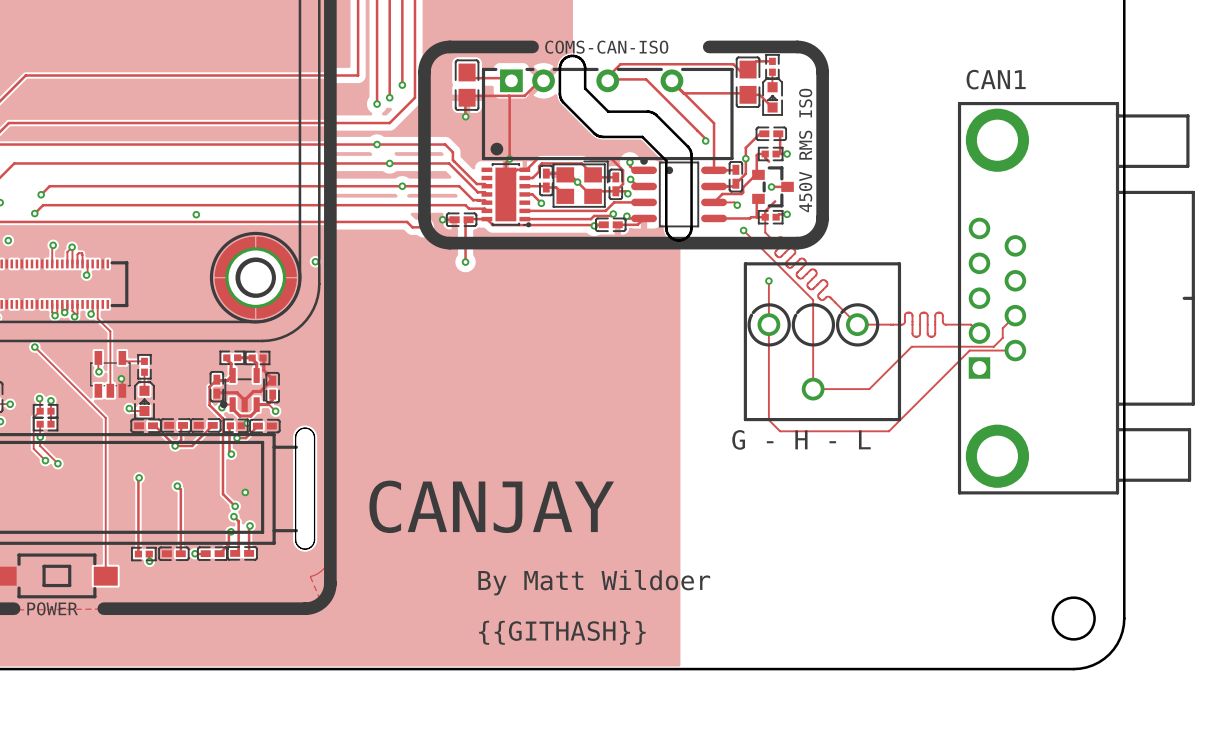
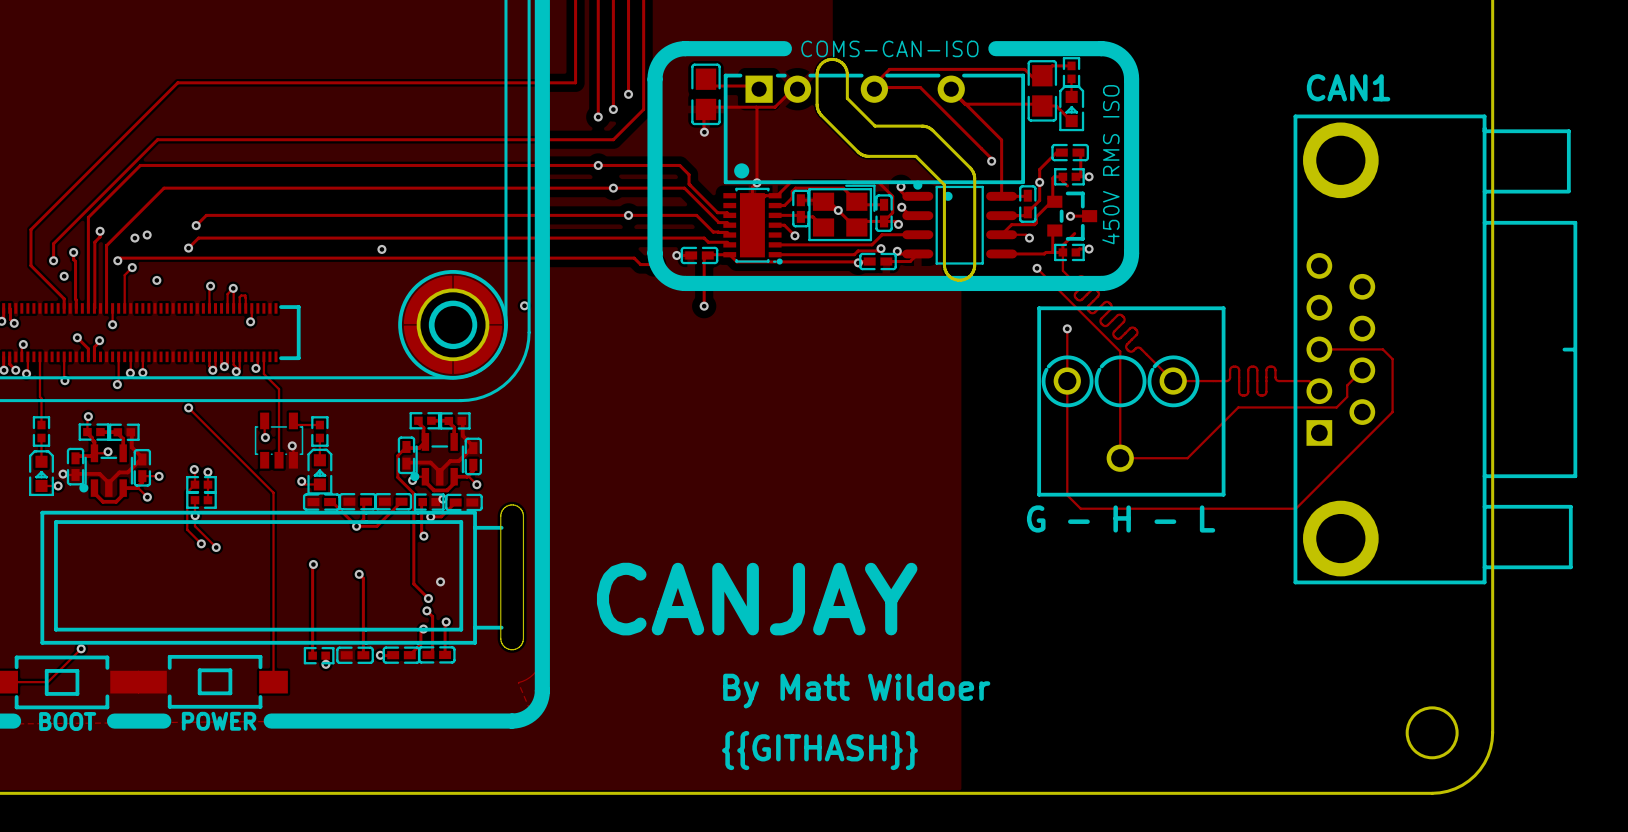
track: (1015, 350) (969, 350) (888, 431) -> (1319, 349) (1382, 349) (1392, 359) (1392, 412) (1295, 508) (1211, 508)

